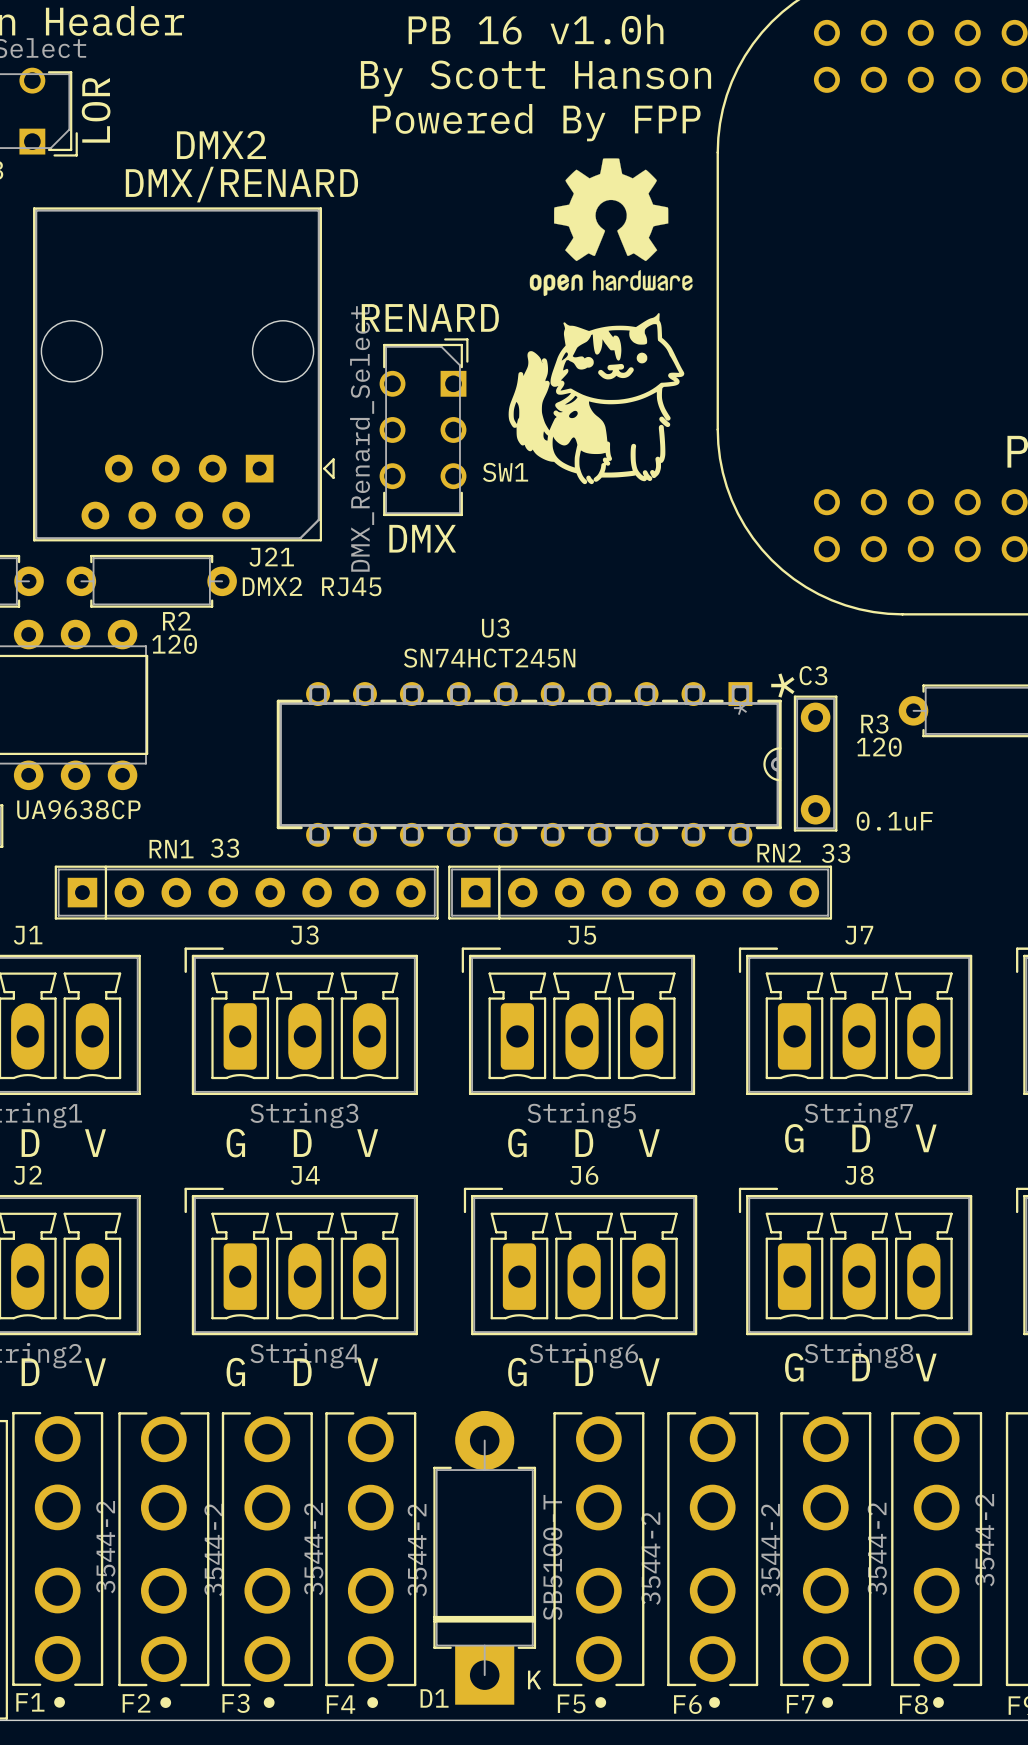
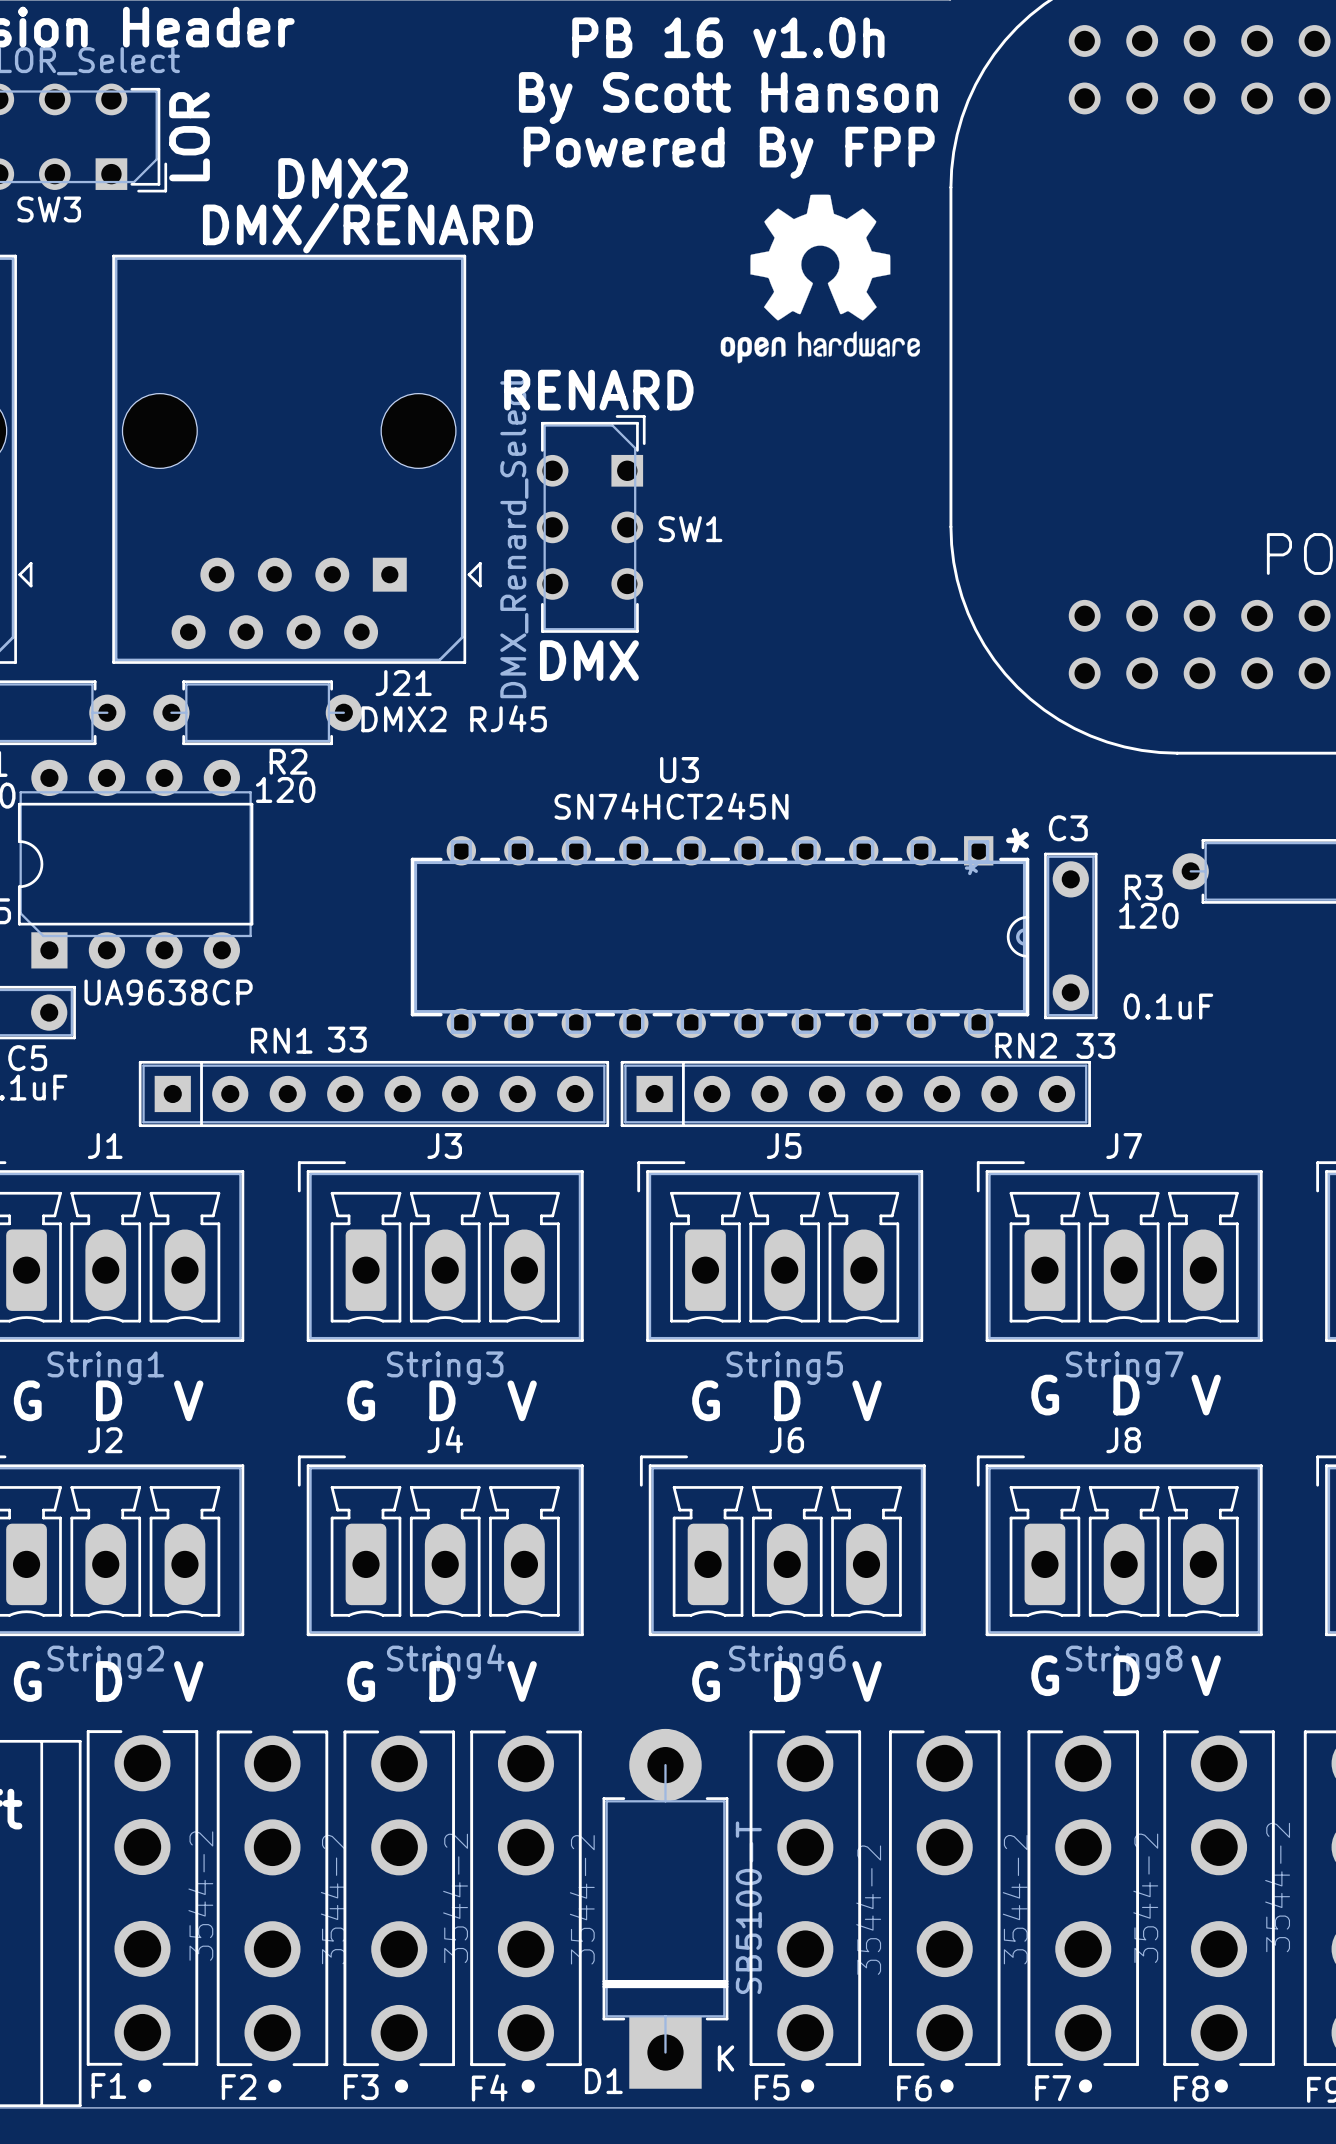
drawing: [508, 313, 685, 485] -> none
SW1 name position: SW1 (505, 472) -> SW1 (690, 529)

